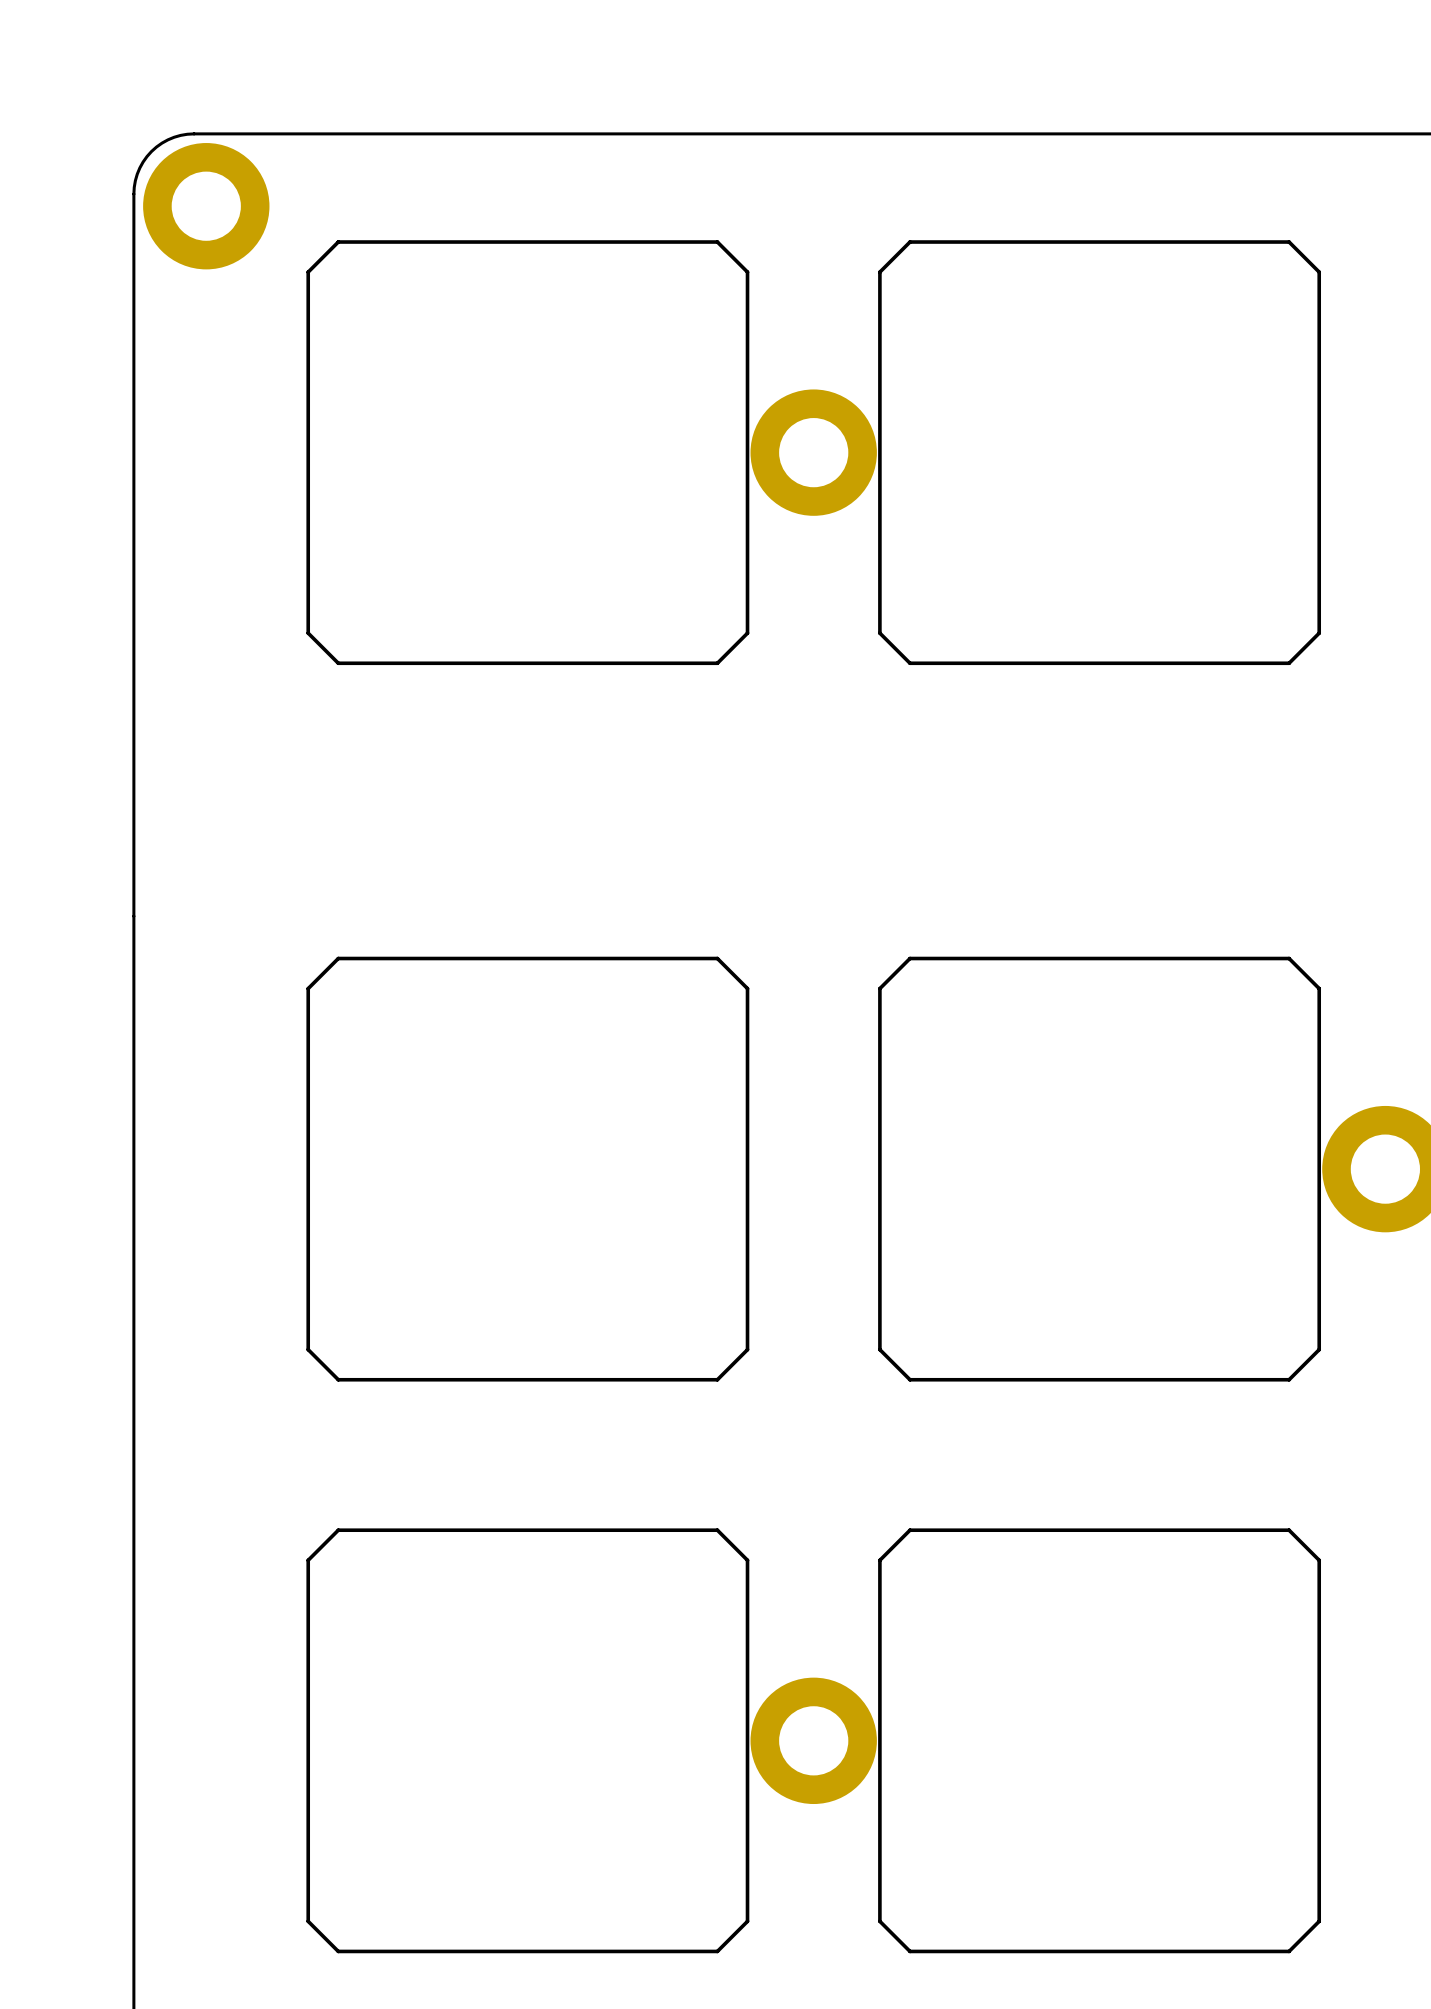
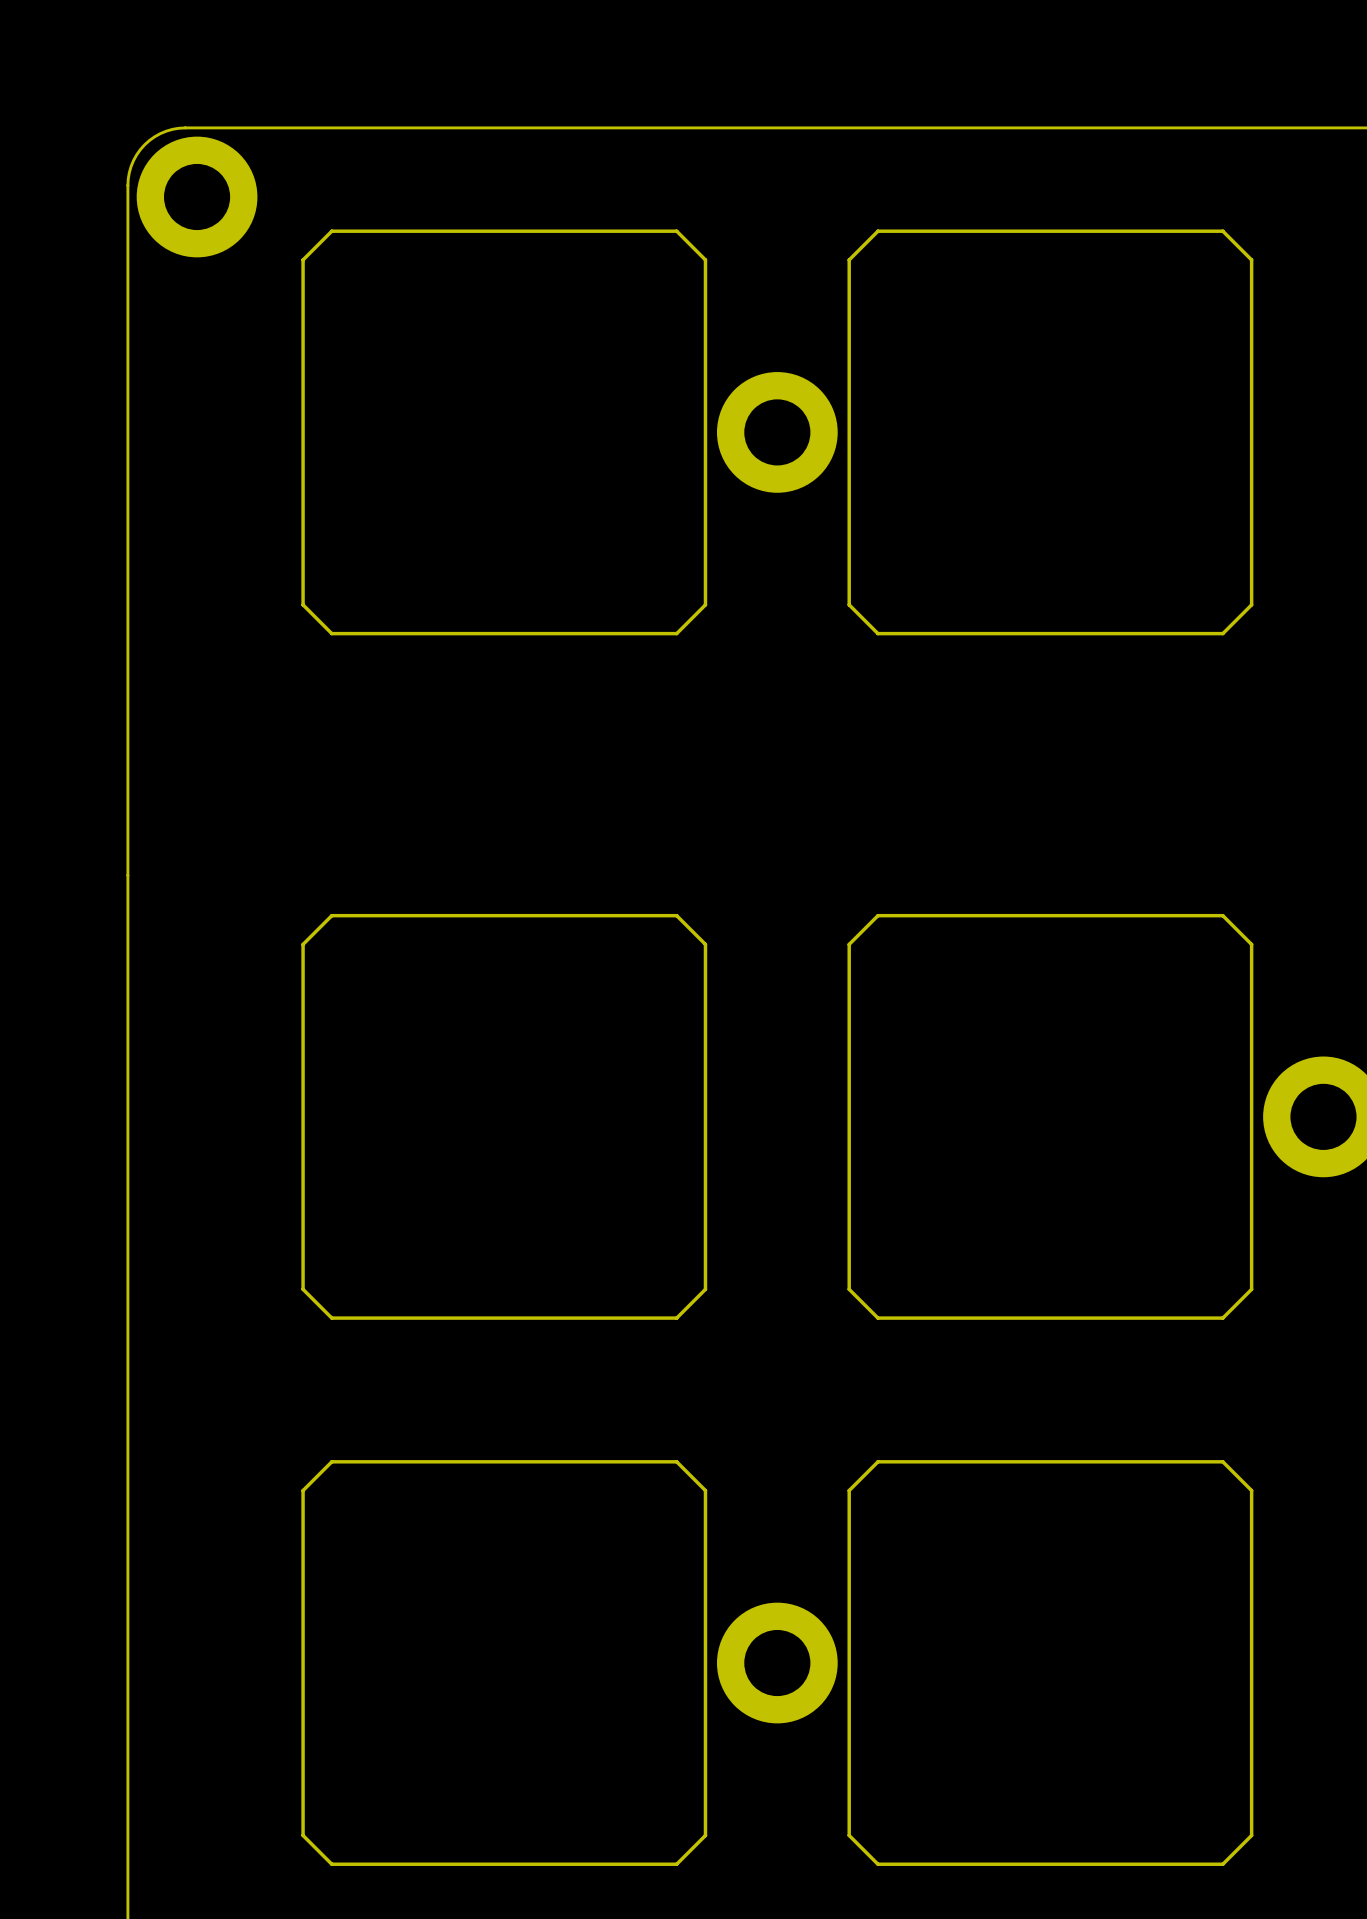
drawing shape: [306, 240, 750, 666] -> [301, 229, 708, 636]
drawing shape: [878, 240, 1322, 666] -> [847, 229, 1254, 636]
drawing shape: [306, 956, 750, 1382] -> [301, 913, 708, 1320]
drawing shape: [878, 956, 1322, 1382] -> [847, 913, 1254, 1320]
drawing shape: [306, 1528, 750, 1954] -> [301, 1460, 708, 1866]
drawing shape: [878, 1528, 1322, 1954] -> [847, 1460, 1254, 1866]

